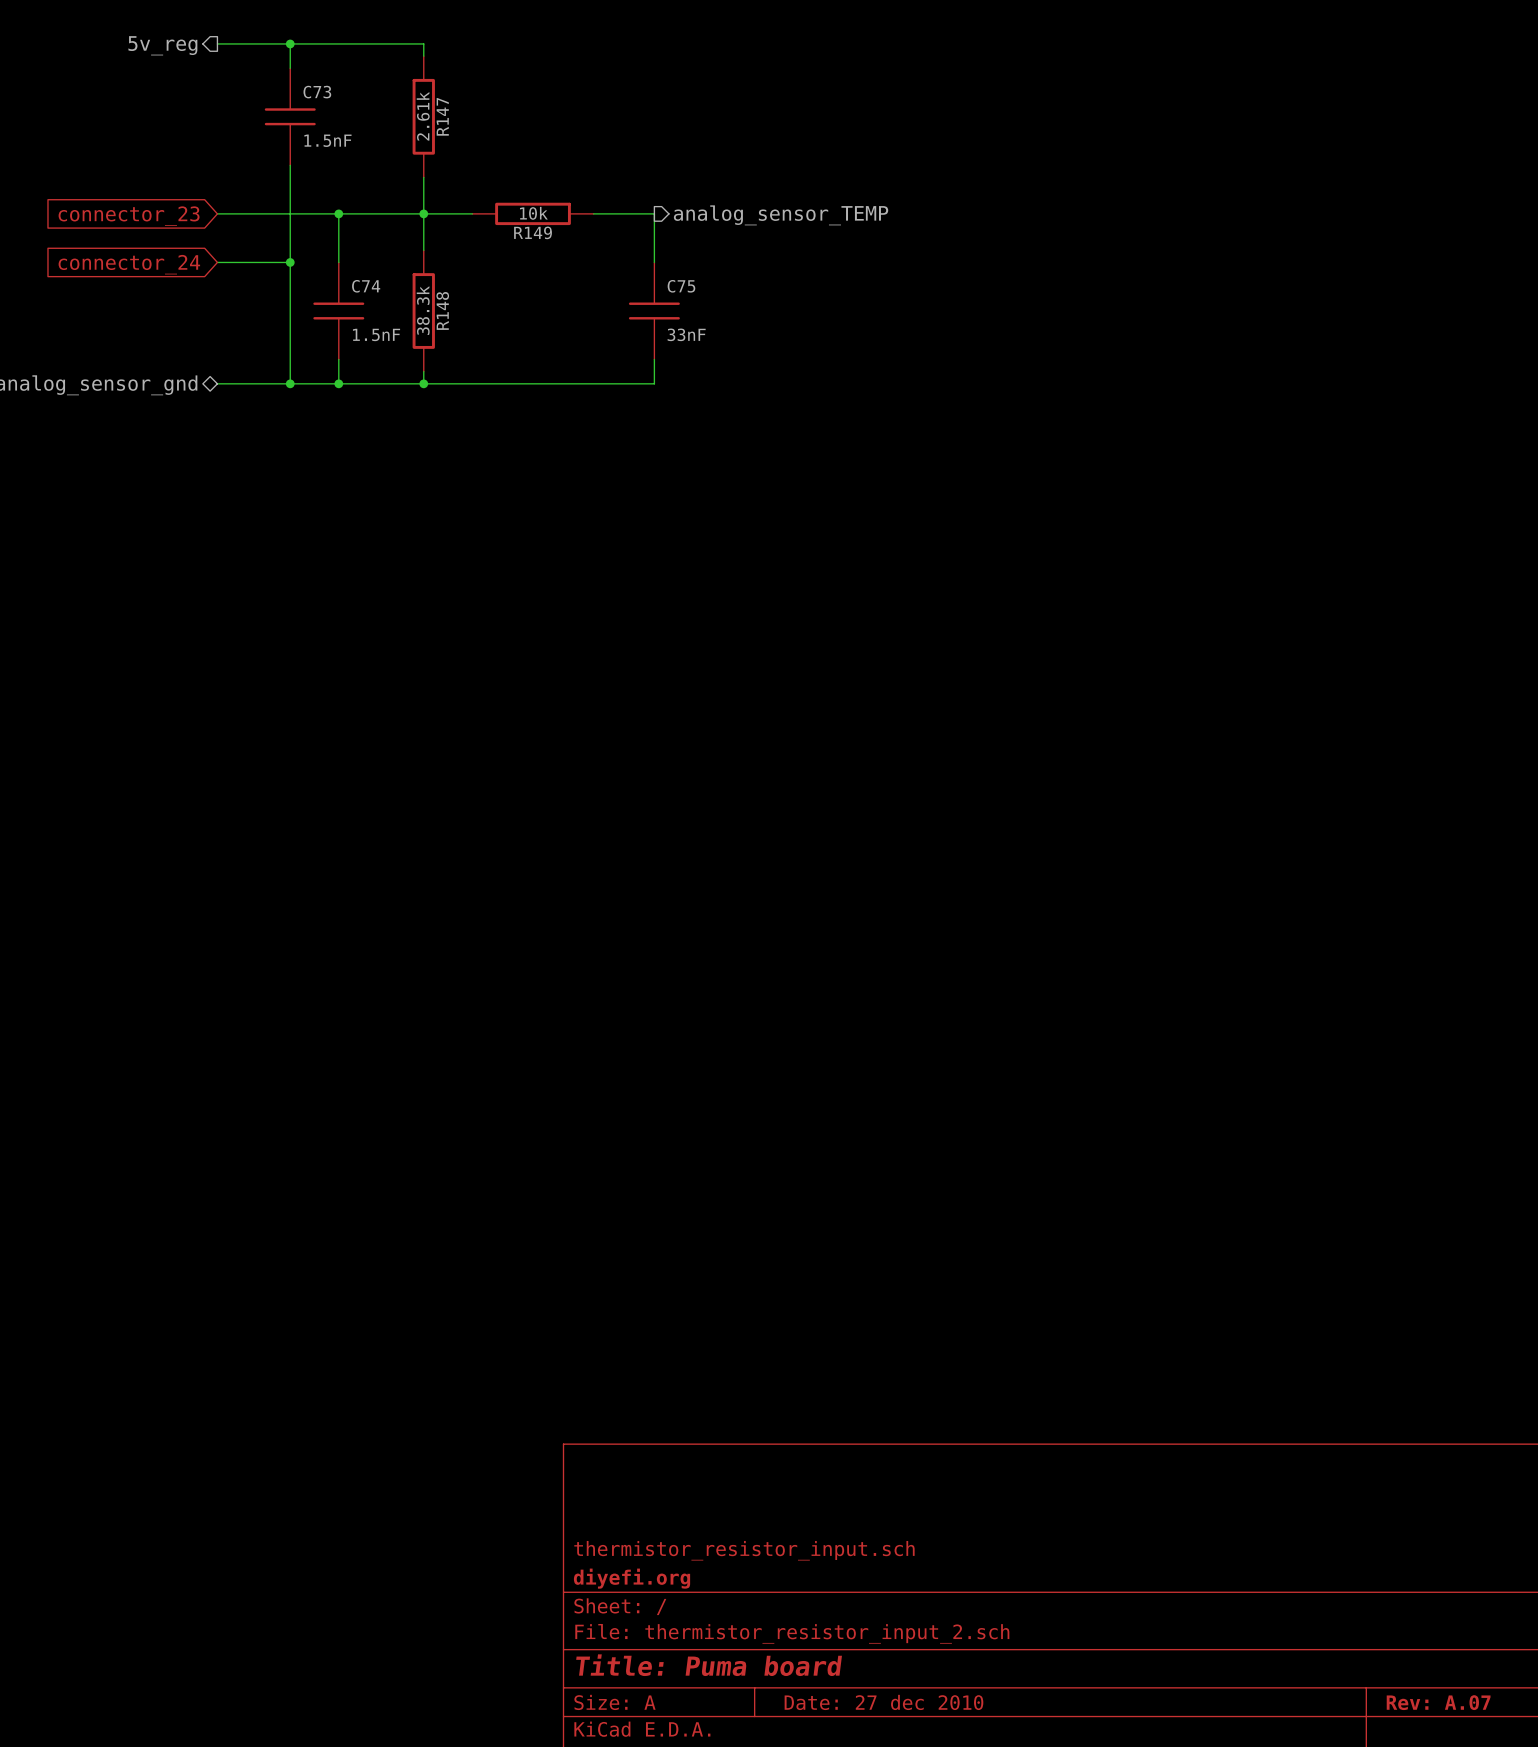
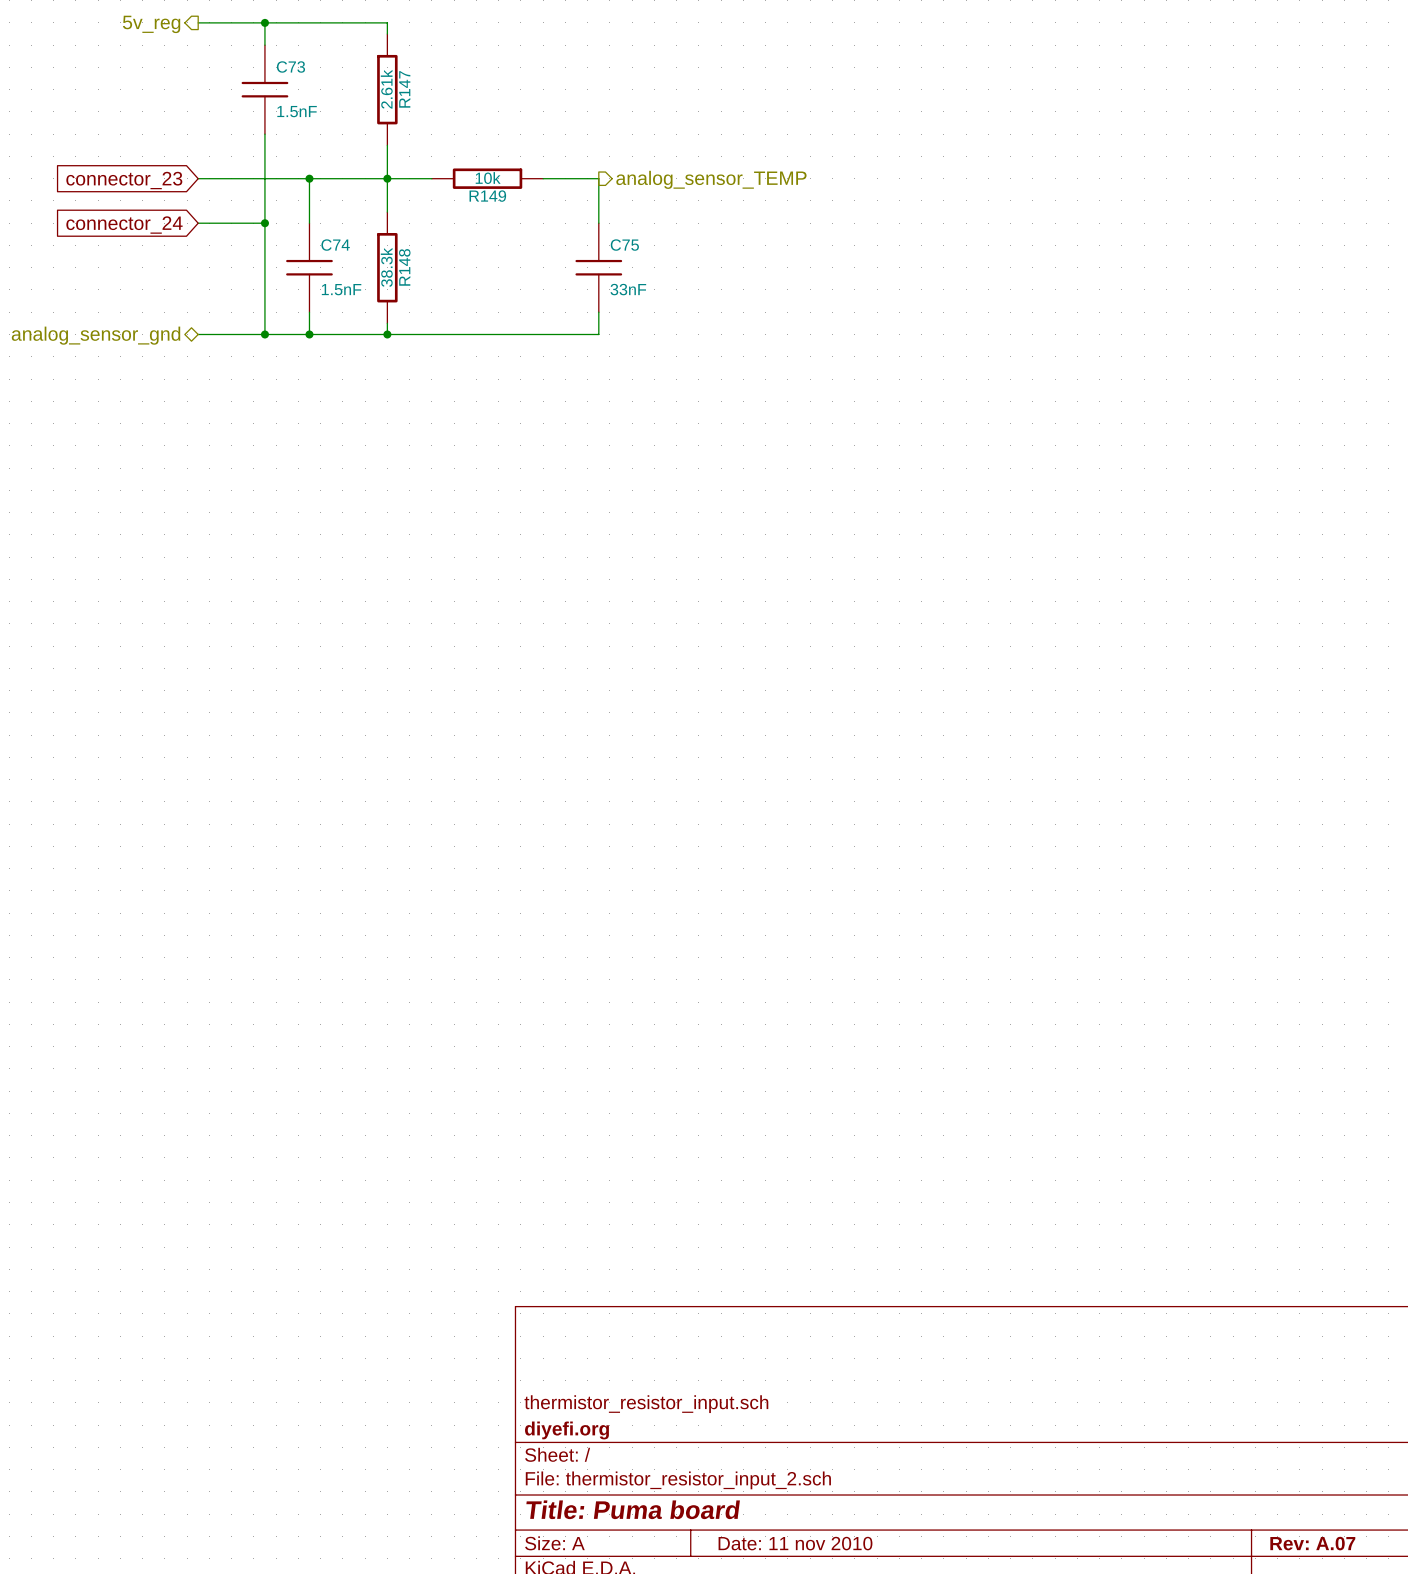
title block: Date: 27 dec 2010 (883, 1702) -> Date: 11 nov 2010 (795, 1543)

